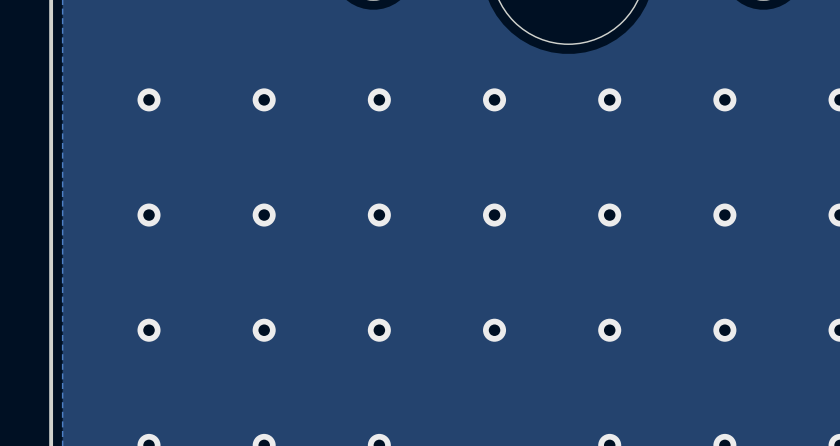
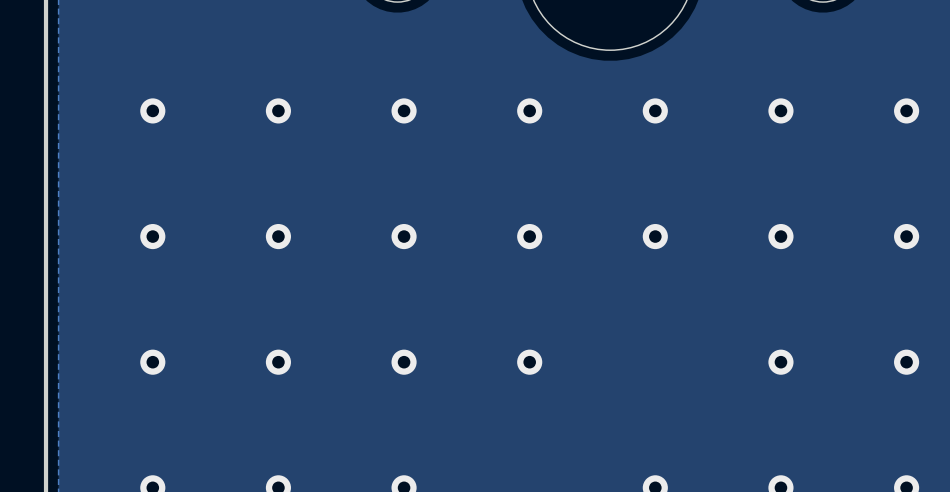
via: (609, 330) -> none

